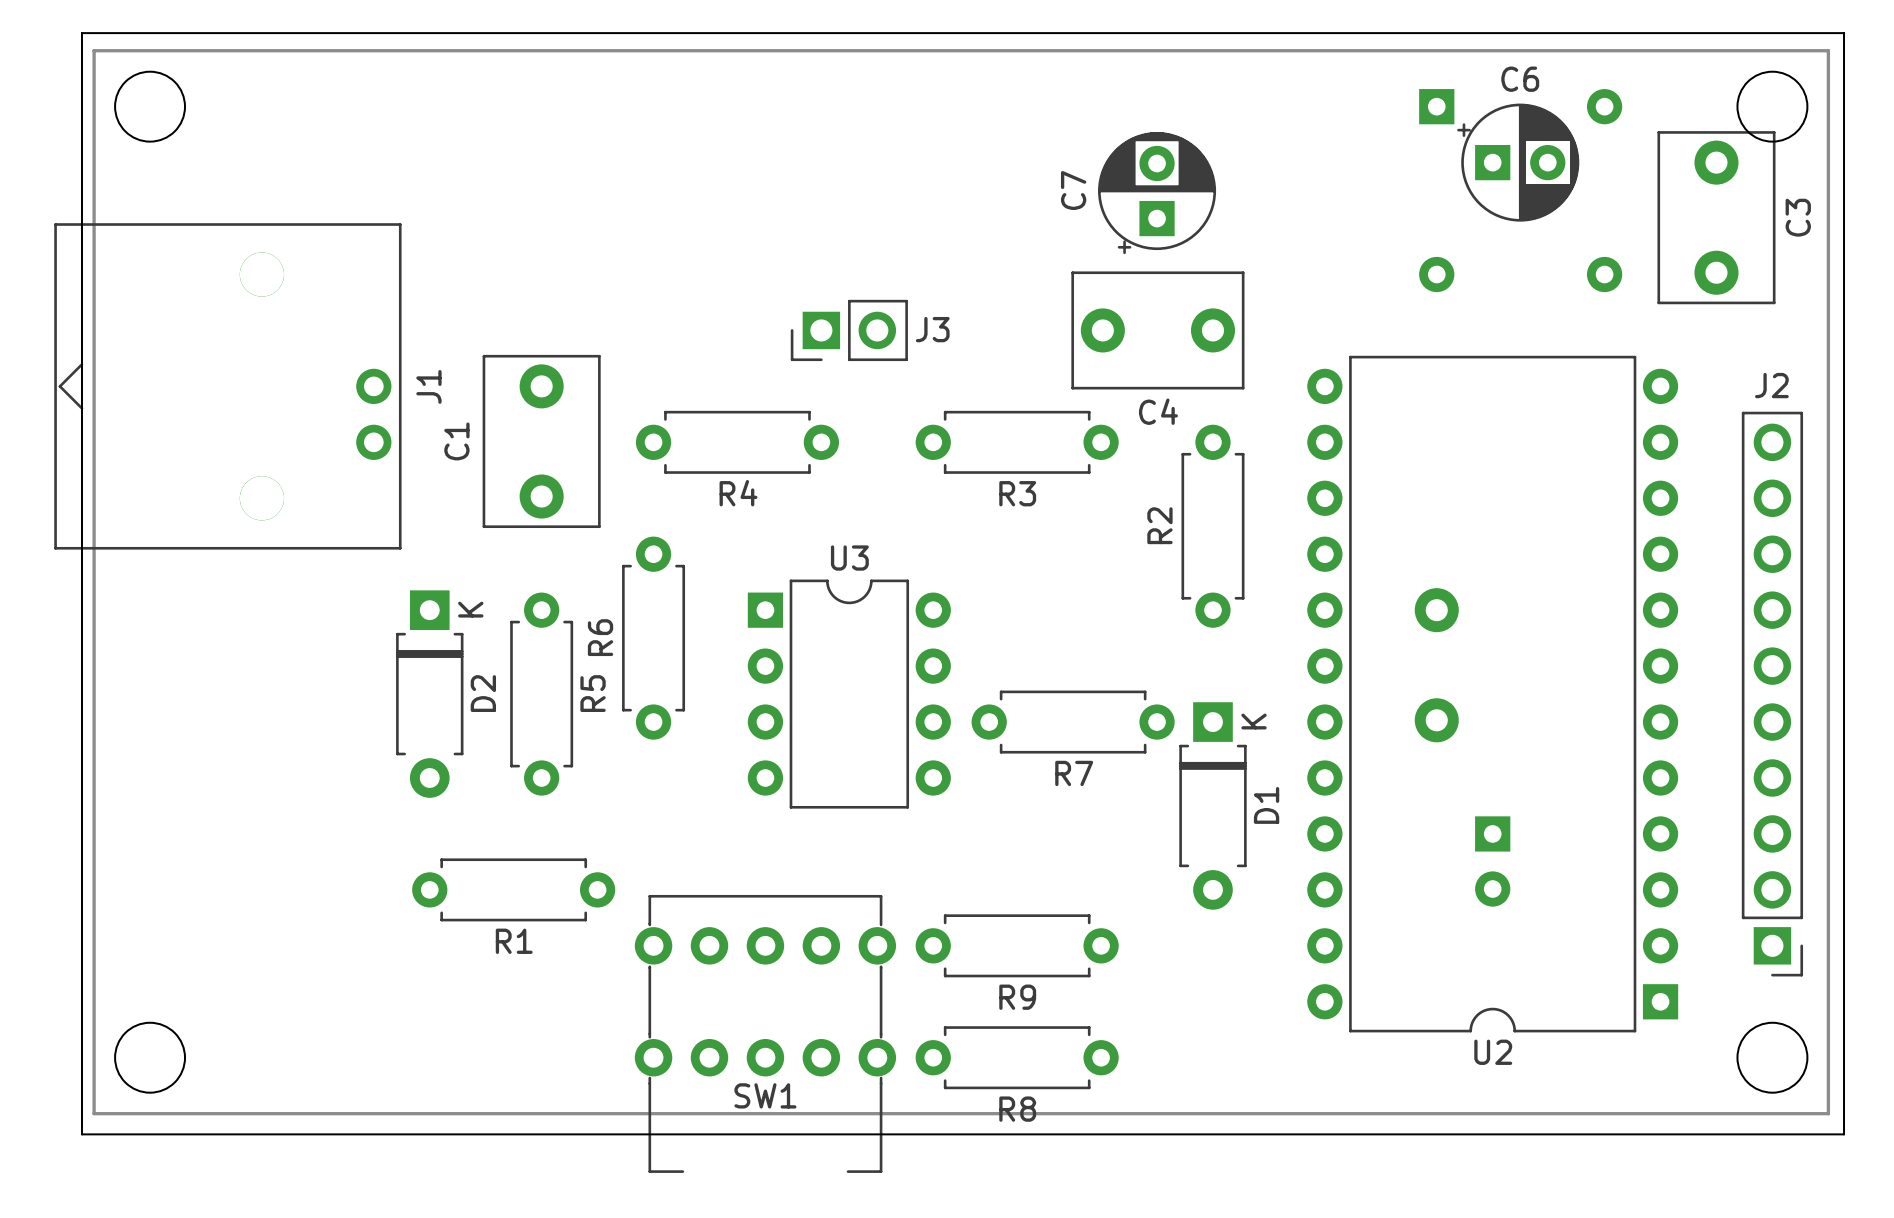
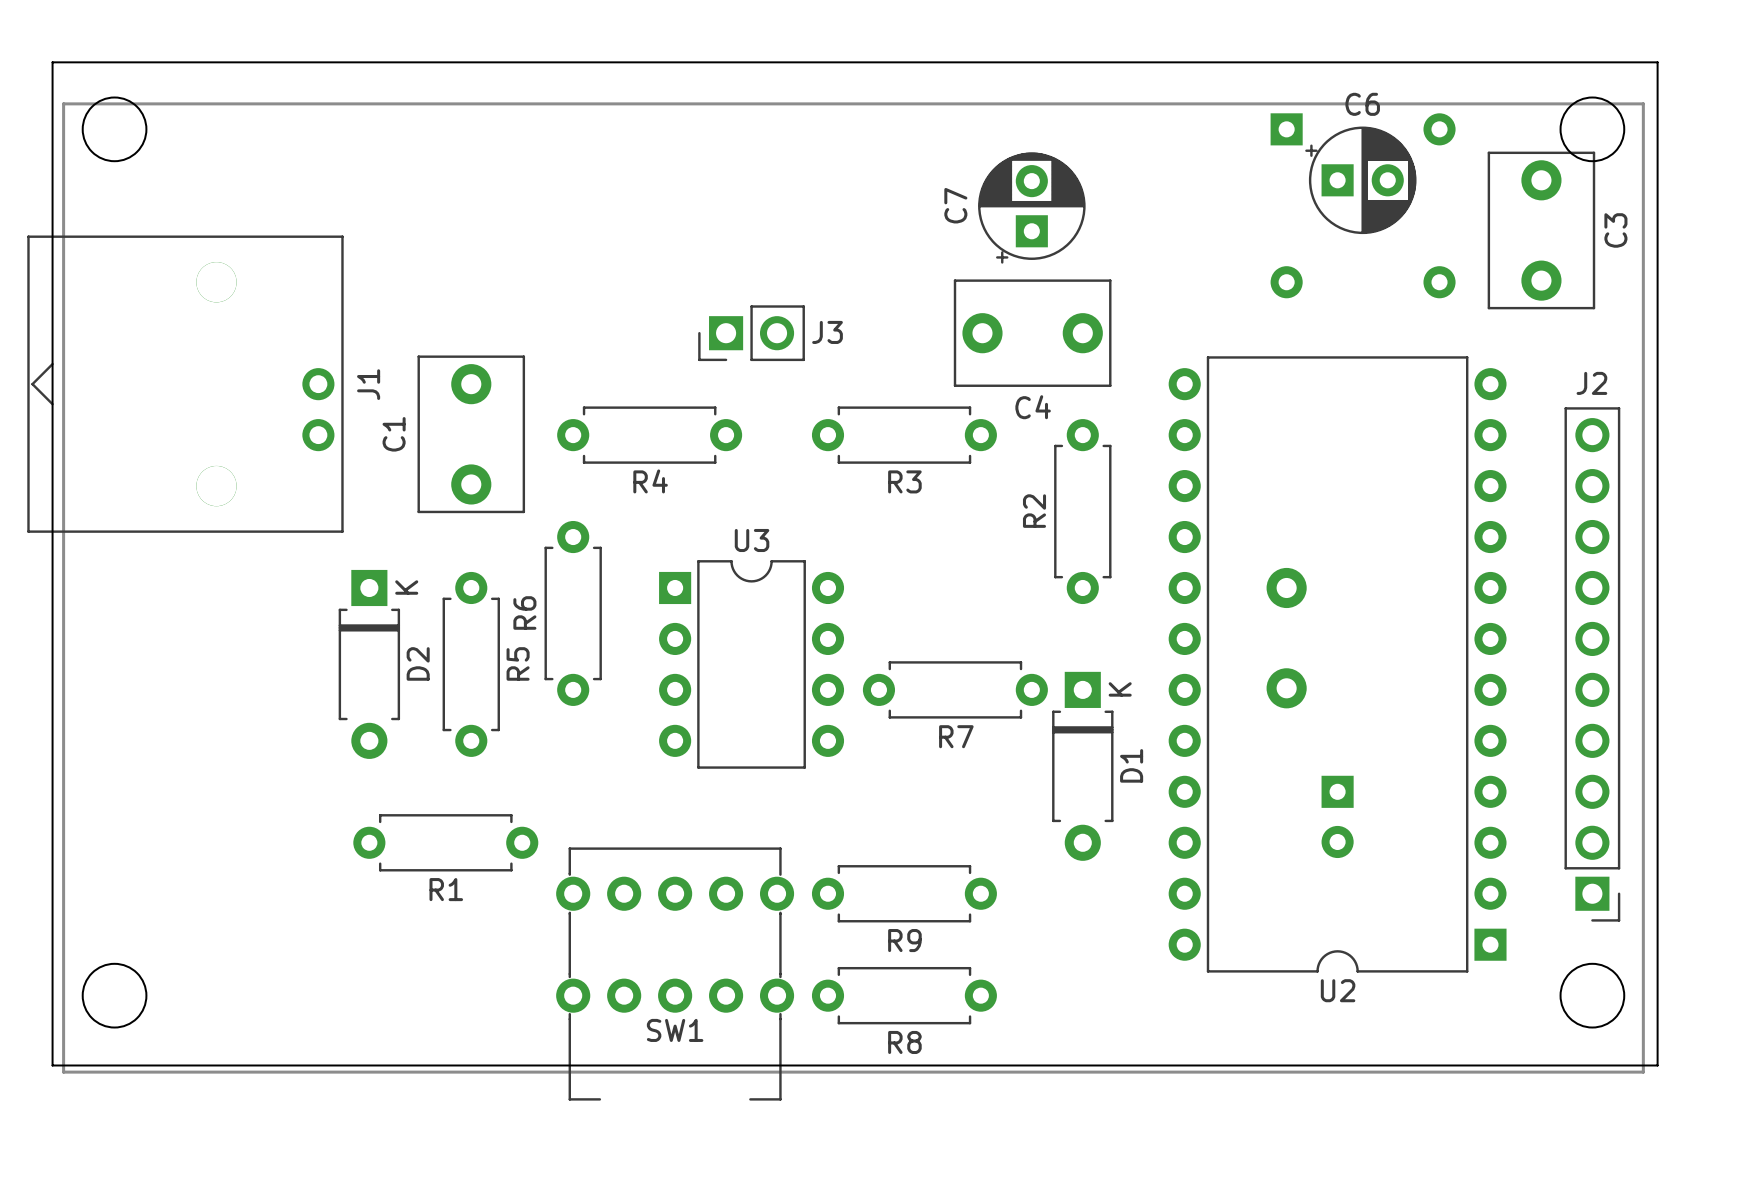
line: (94, 78) (94, 50) (1828, 50) (1828, 78) -> (63, 103) (1643, 103)
line: (94, 1113) (1828, 1113) -> (63, 1046) (63, 1072) (1643, 1072) (1643, 1046)

